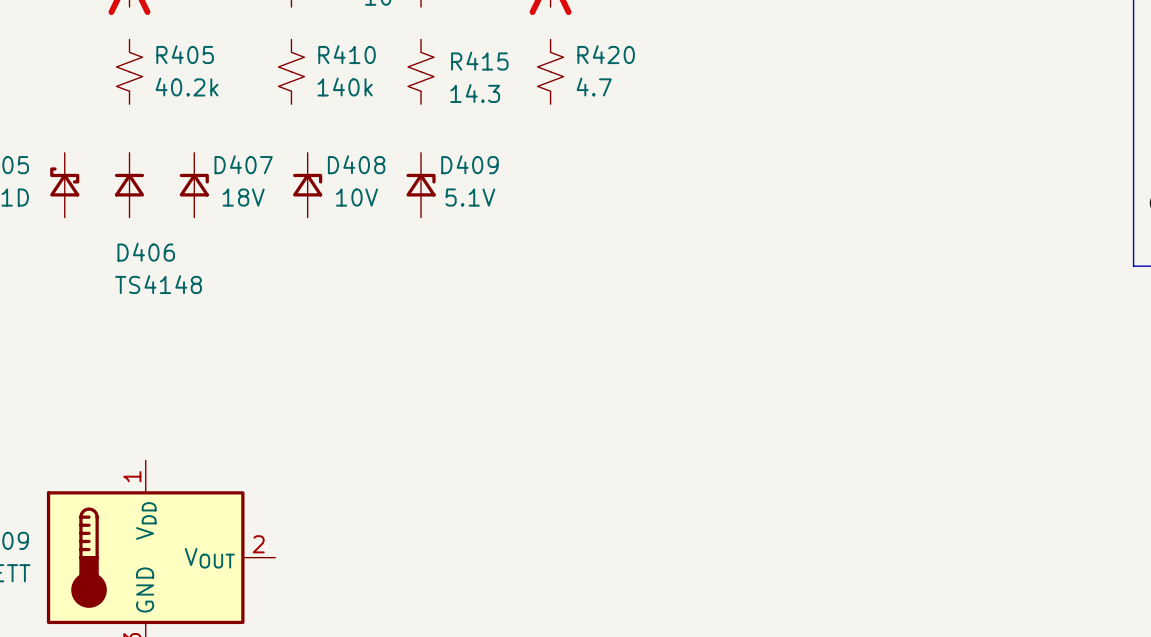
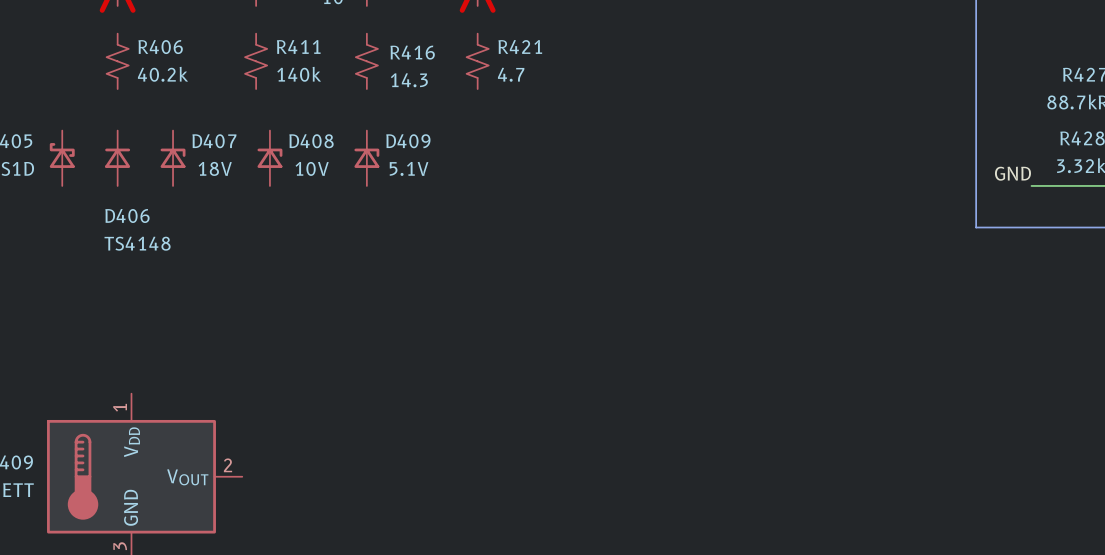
R405 name: R405 (185, 54) -> R406 (160, 47)
R410 name: R410 (347, 54) -> R411 (298, 46)
R420 name: R420 (606, 54) -> R421 (520, 46)
R415 name: R415 (479, 61) -> R416 (412, 52)

